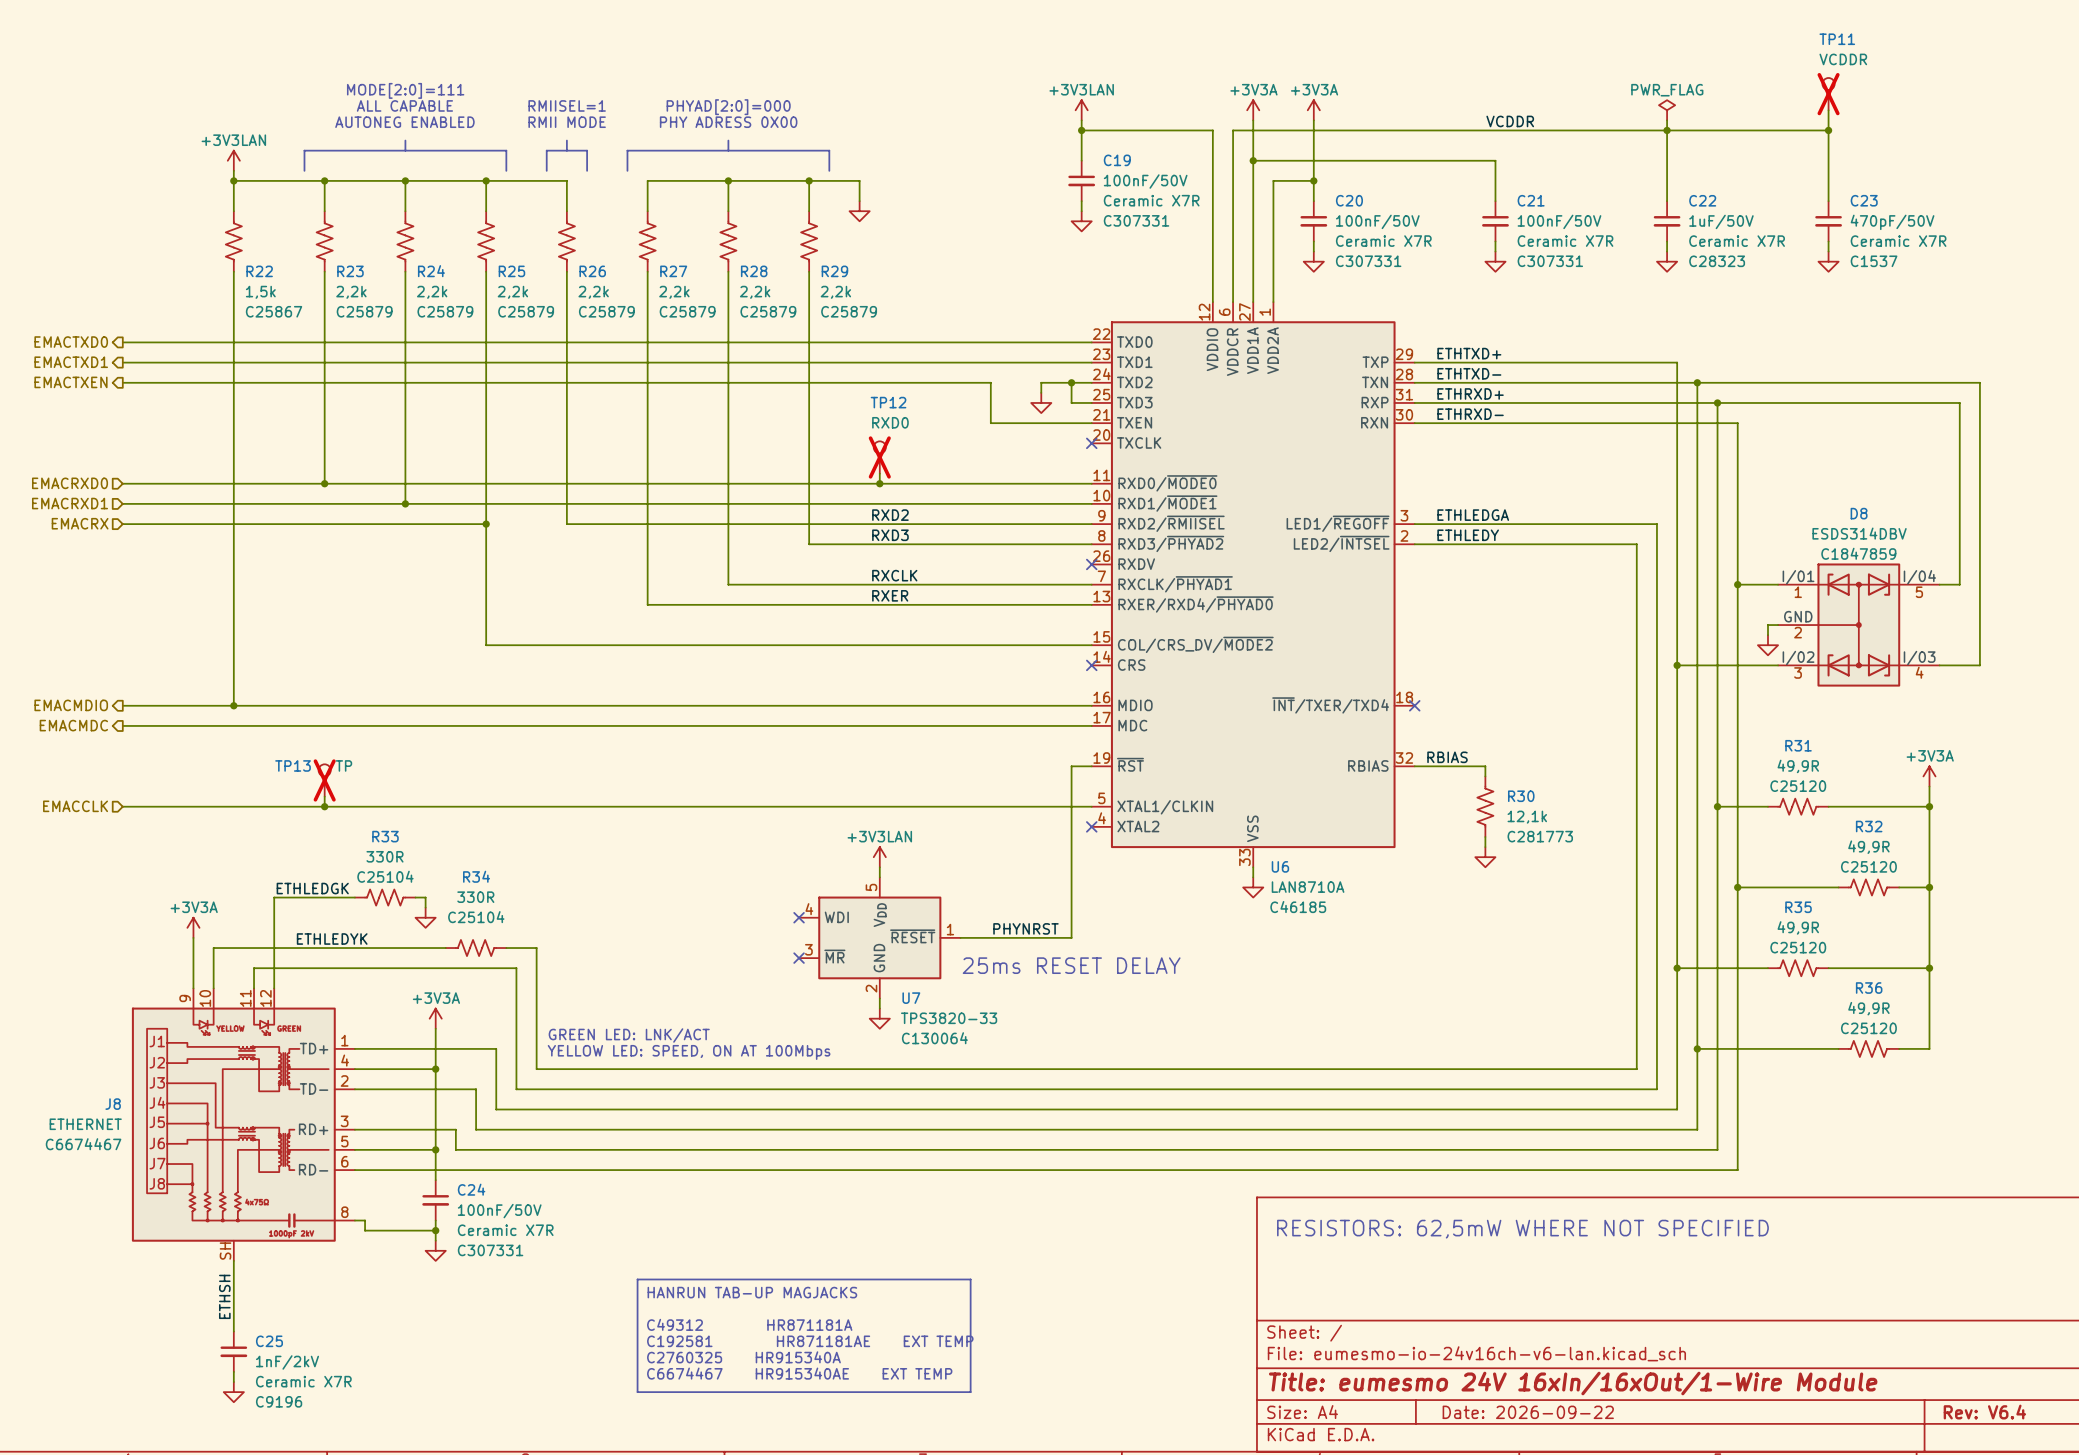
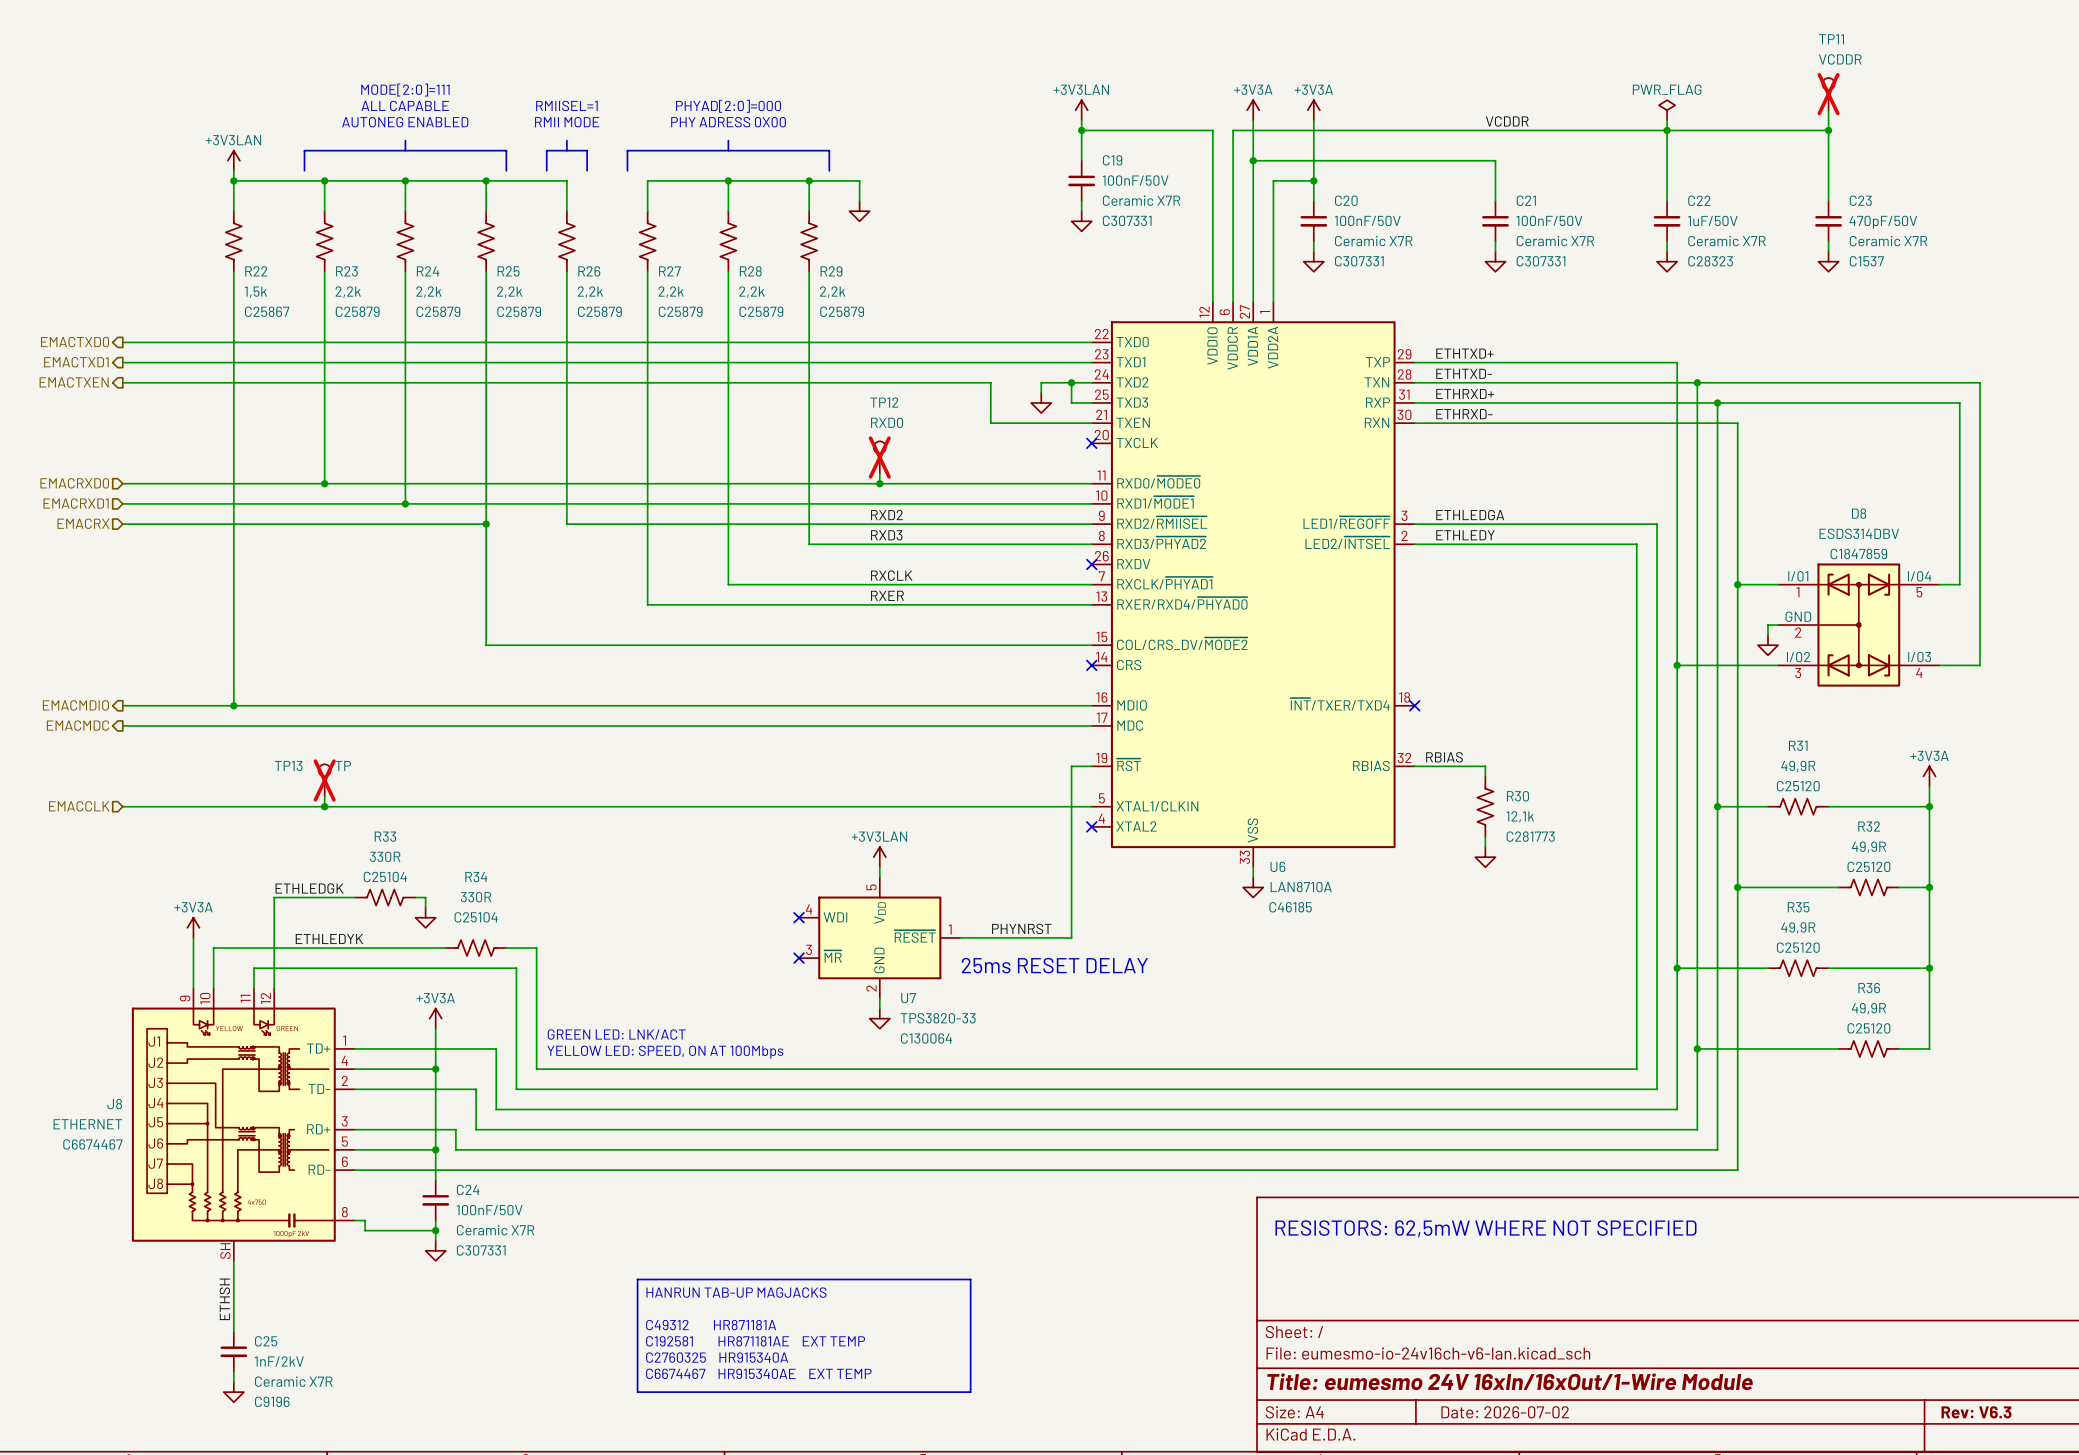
title block: Date: 2026-09-22 (1528, 1412) -> Date: 2026-07-02 (1505, 1412)
title block: Rev: V6.4 (1984, 1412) -> Rev: V6.3 (1976, 1412)

